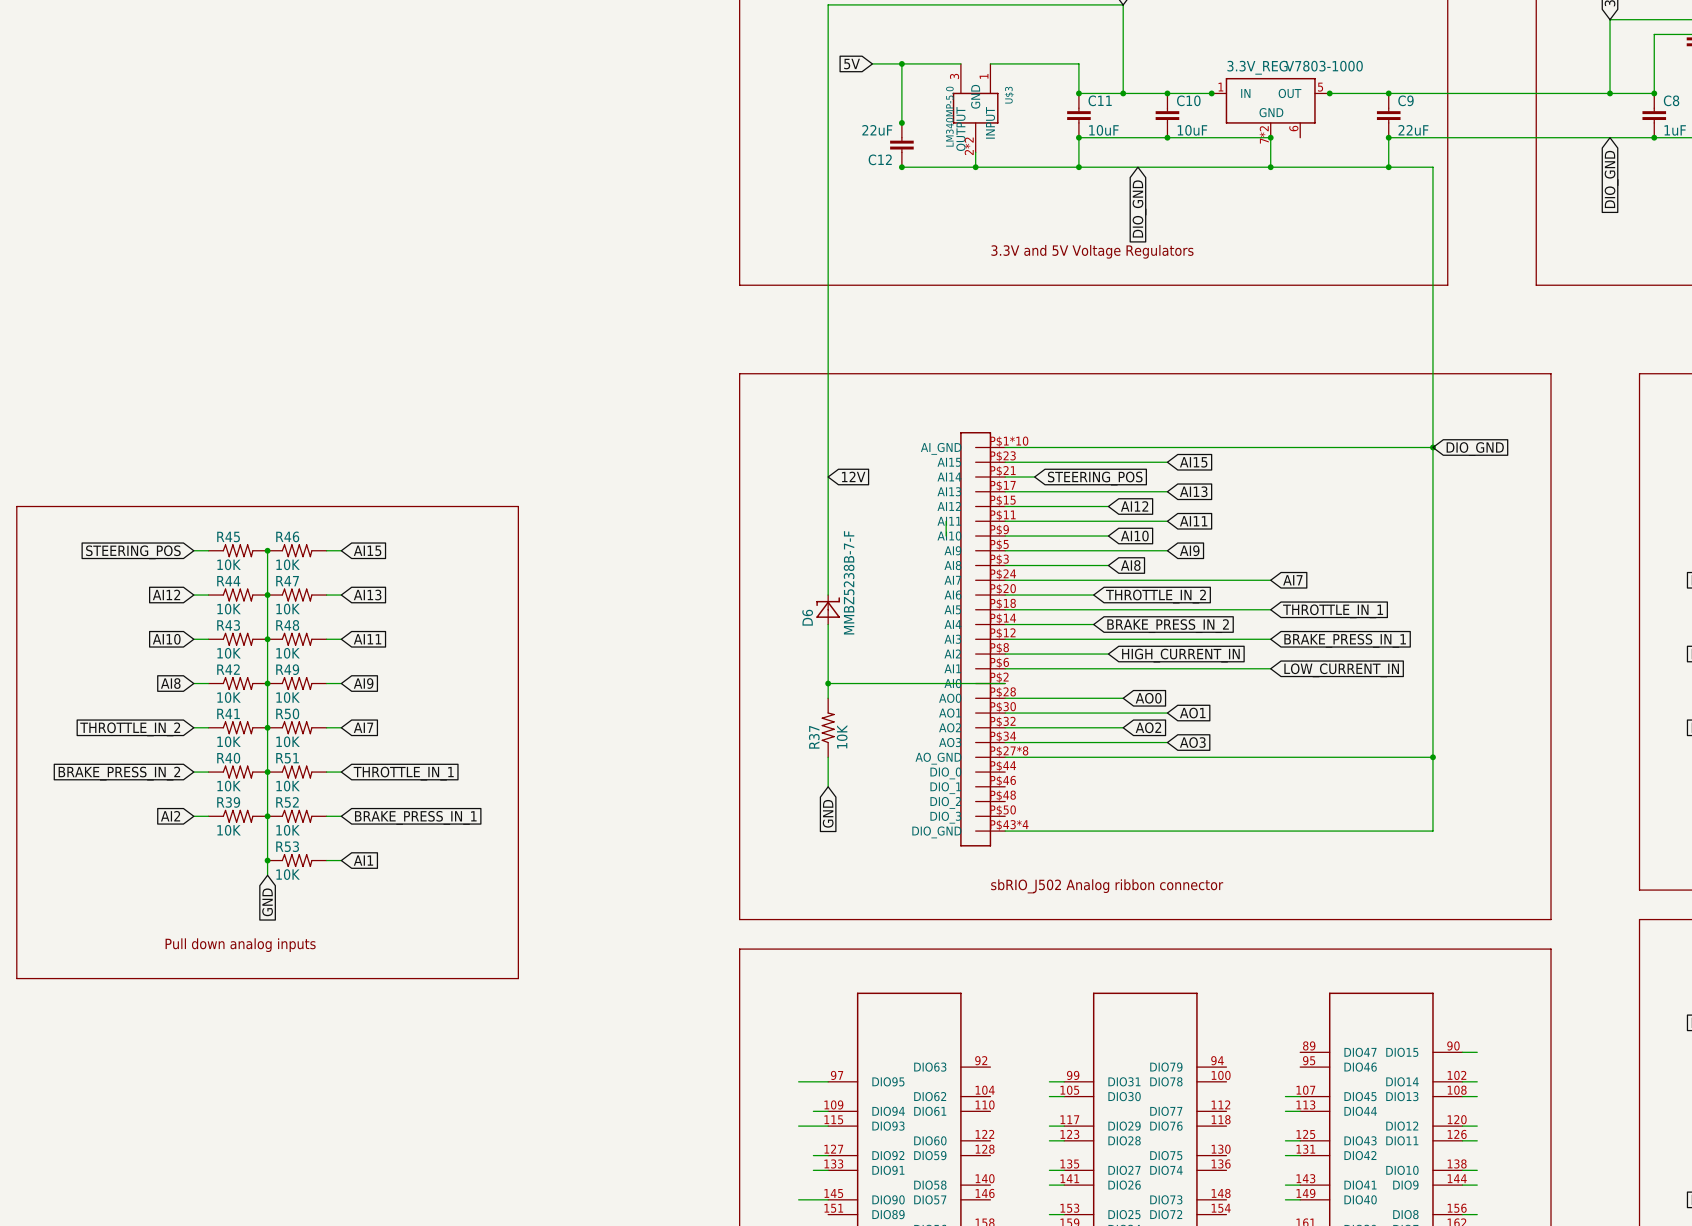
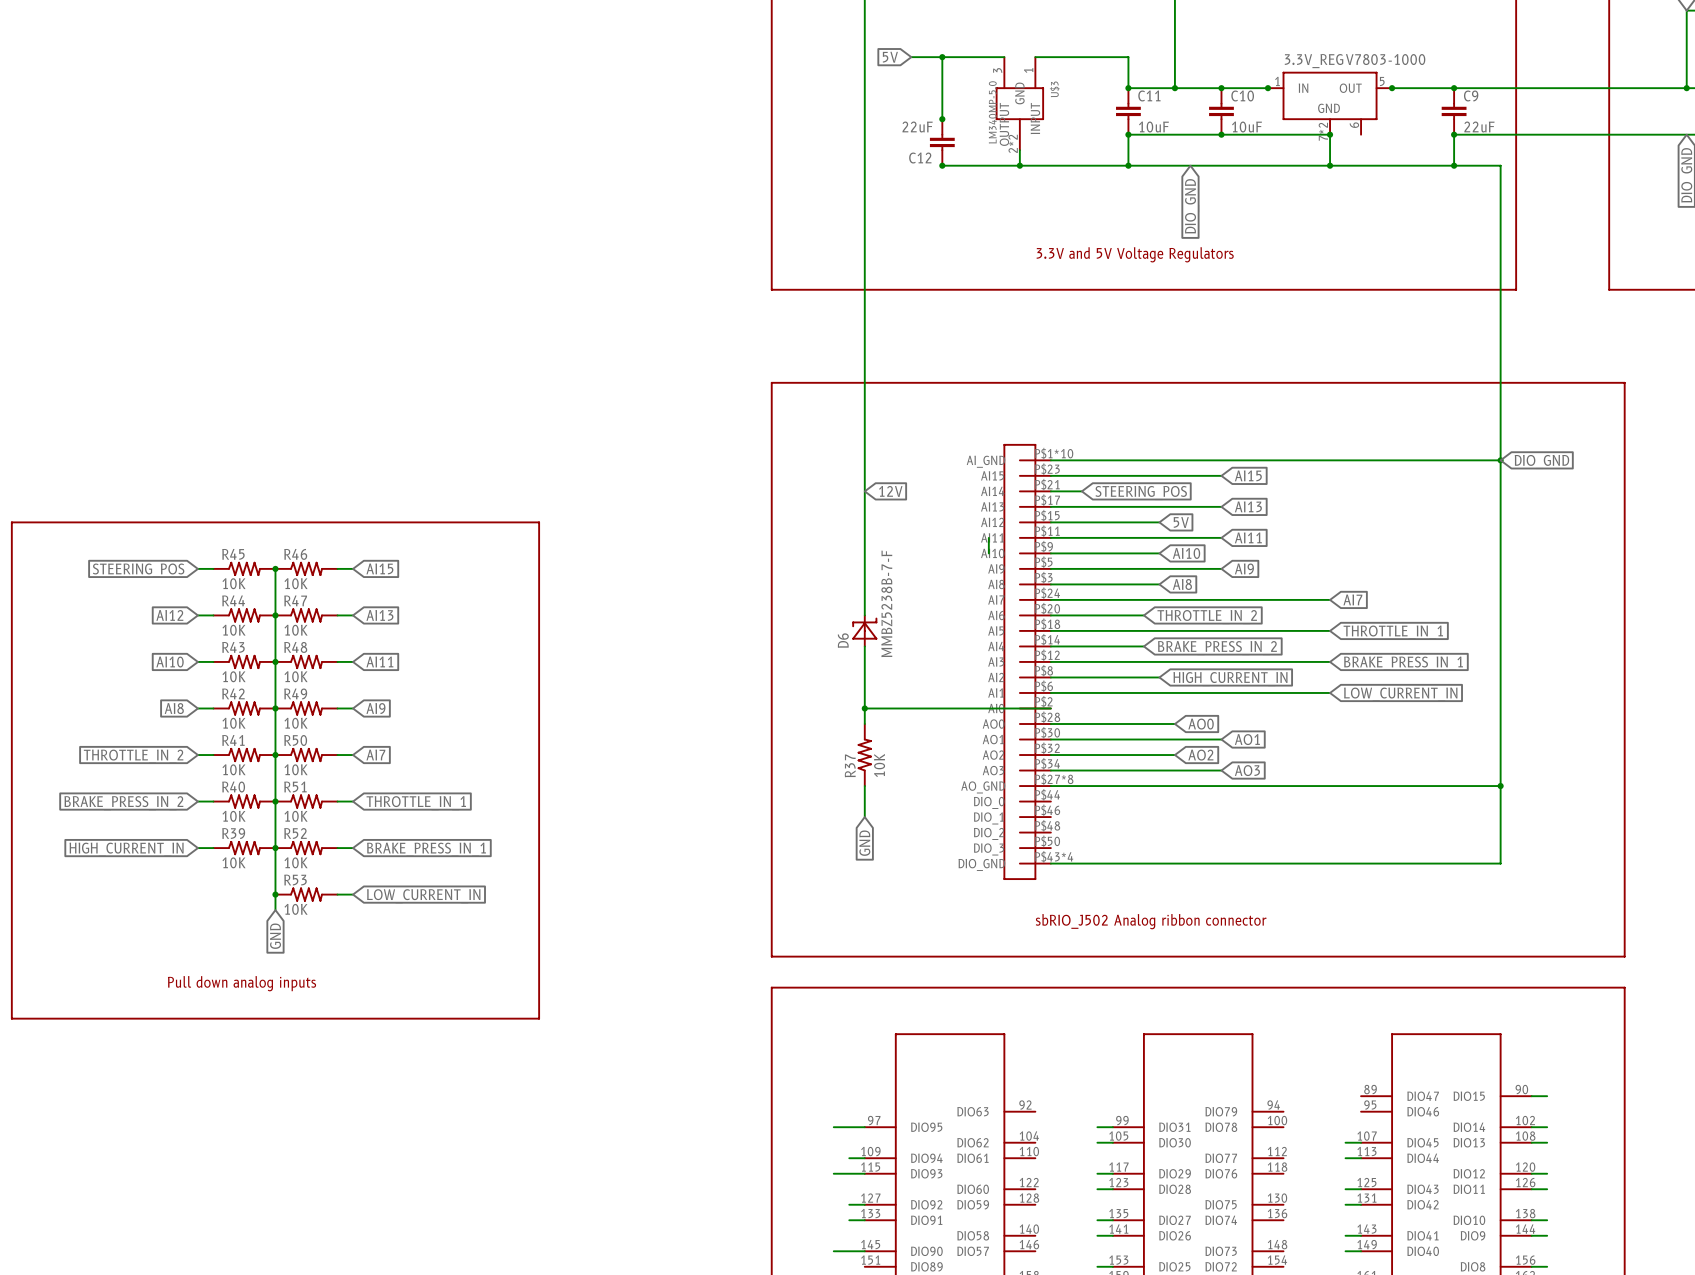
global label: AI12 (1134, 506) -> 5V (1181, 522)
global label: AI2 (170, 816) -> HIGH_CURRENT_IN (126, 849)
global label: AI1 (363, 860) -> LOW_CURRENT_IN (423, 896)

